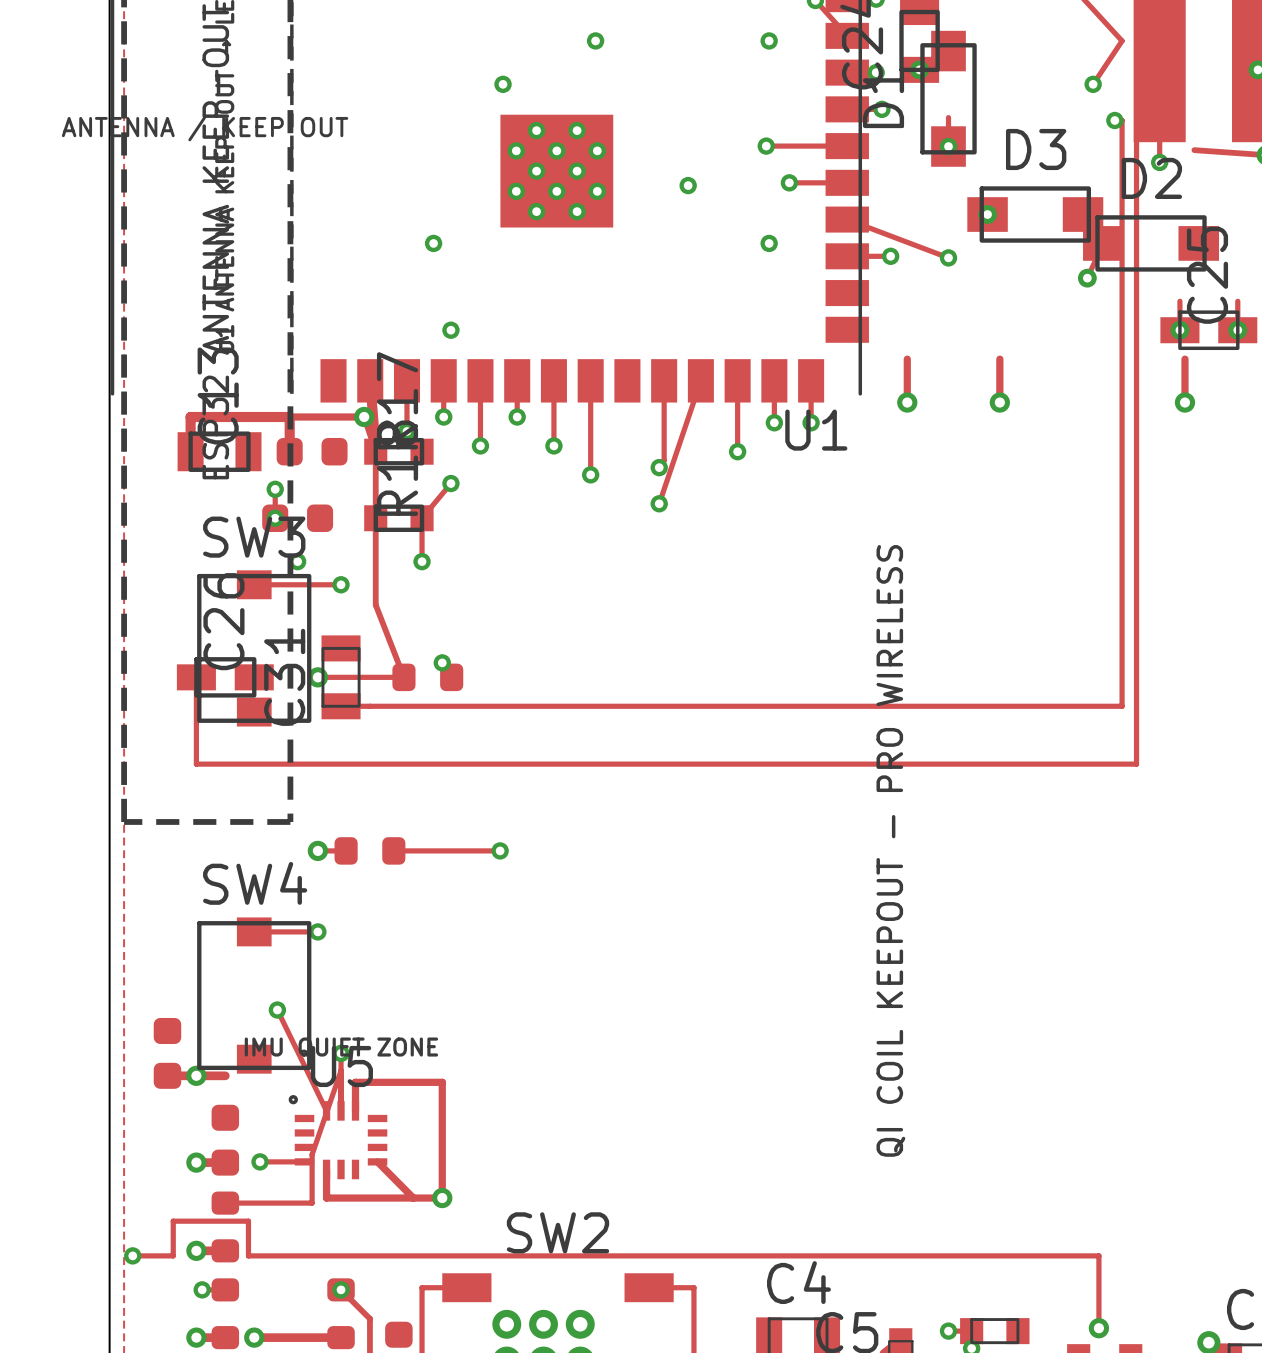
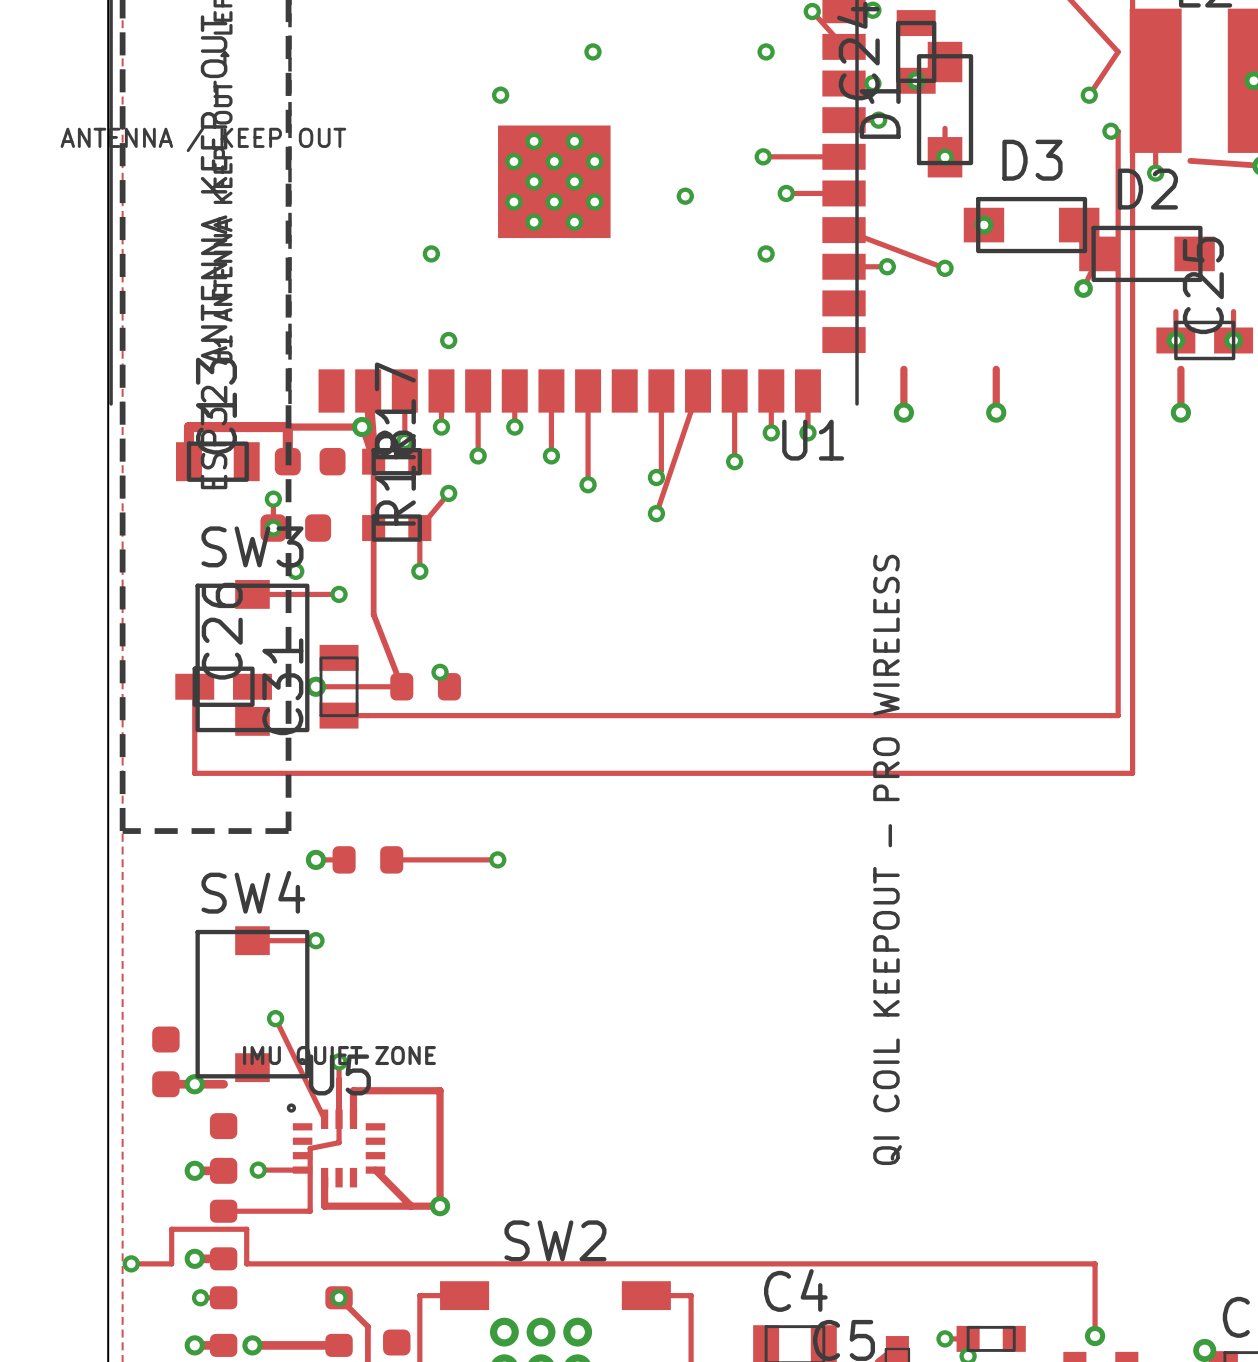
track: (341, 1070) (312, 1154) -> (339, 1119) (339, 1142) (310, 1148) (310, 1162)

